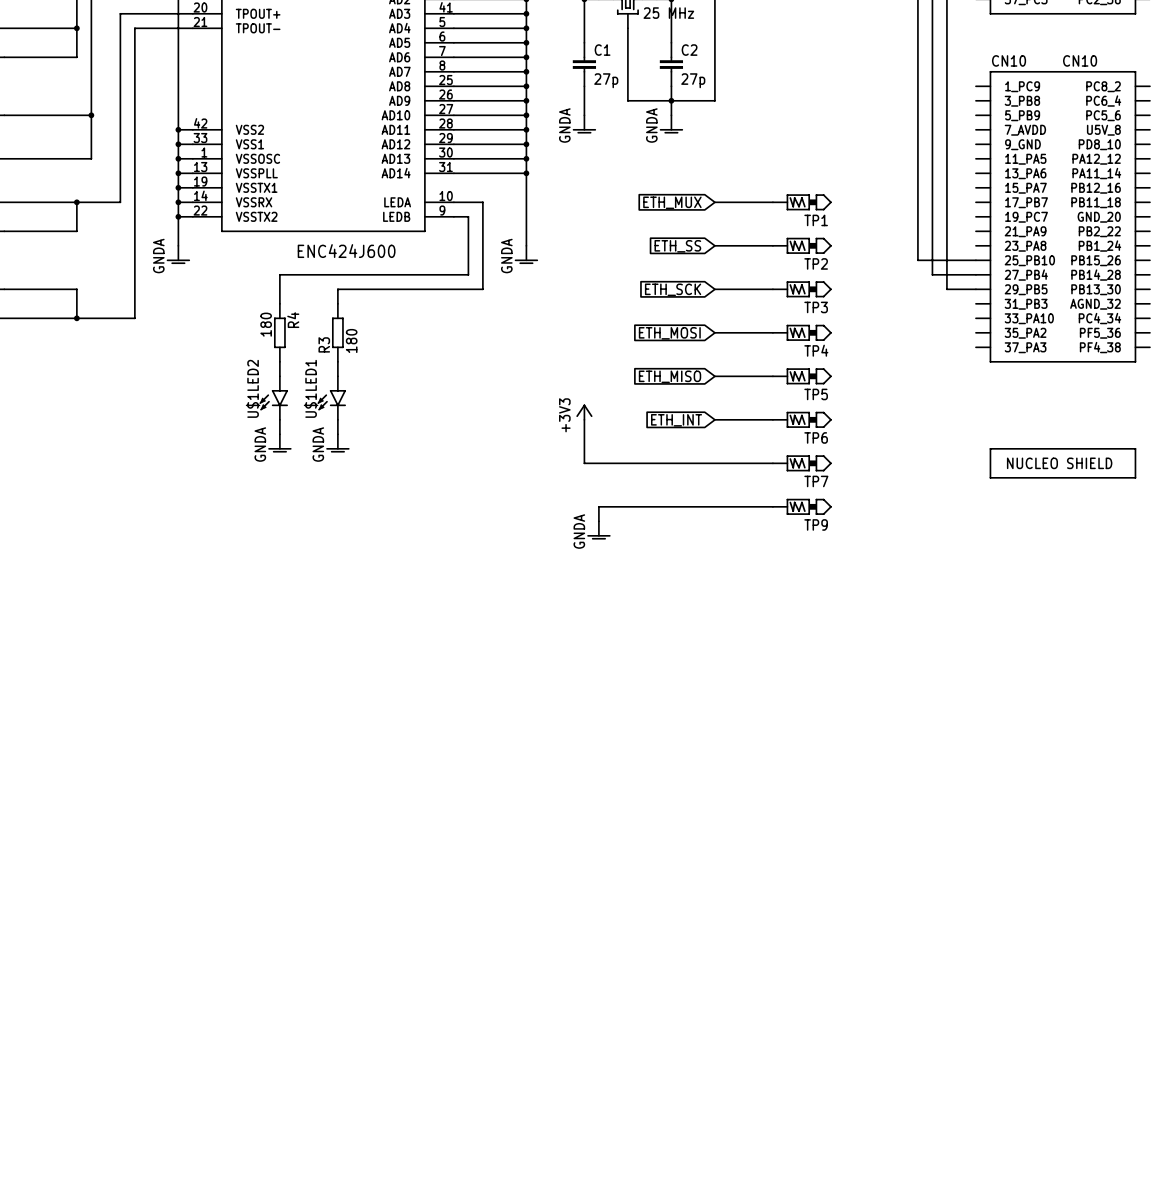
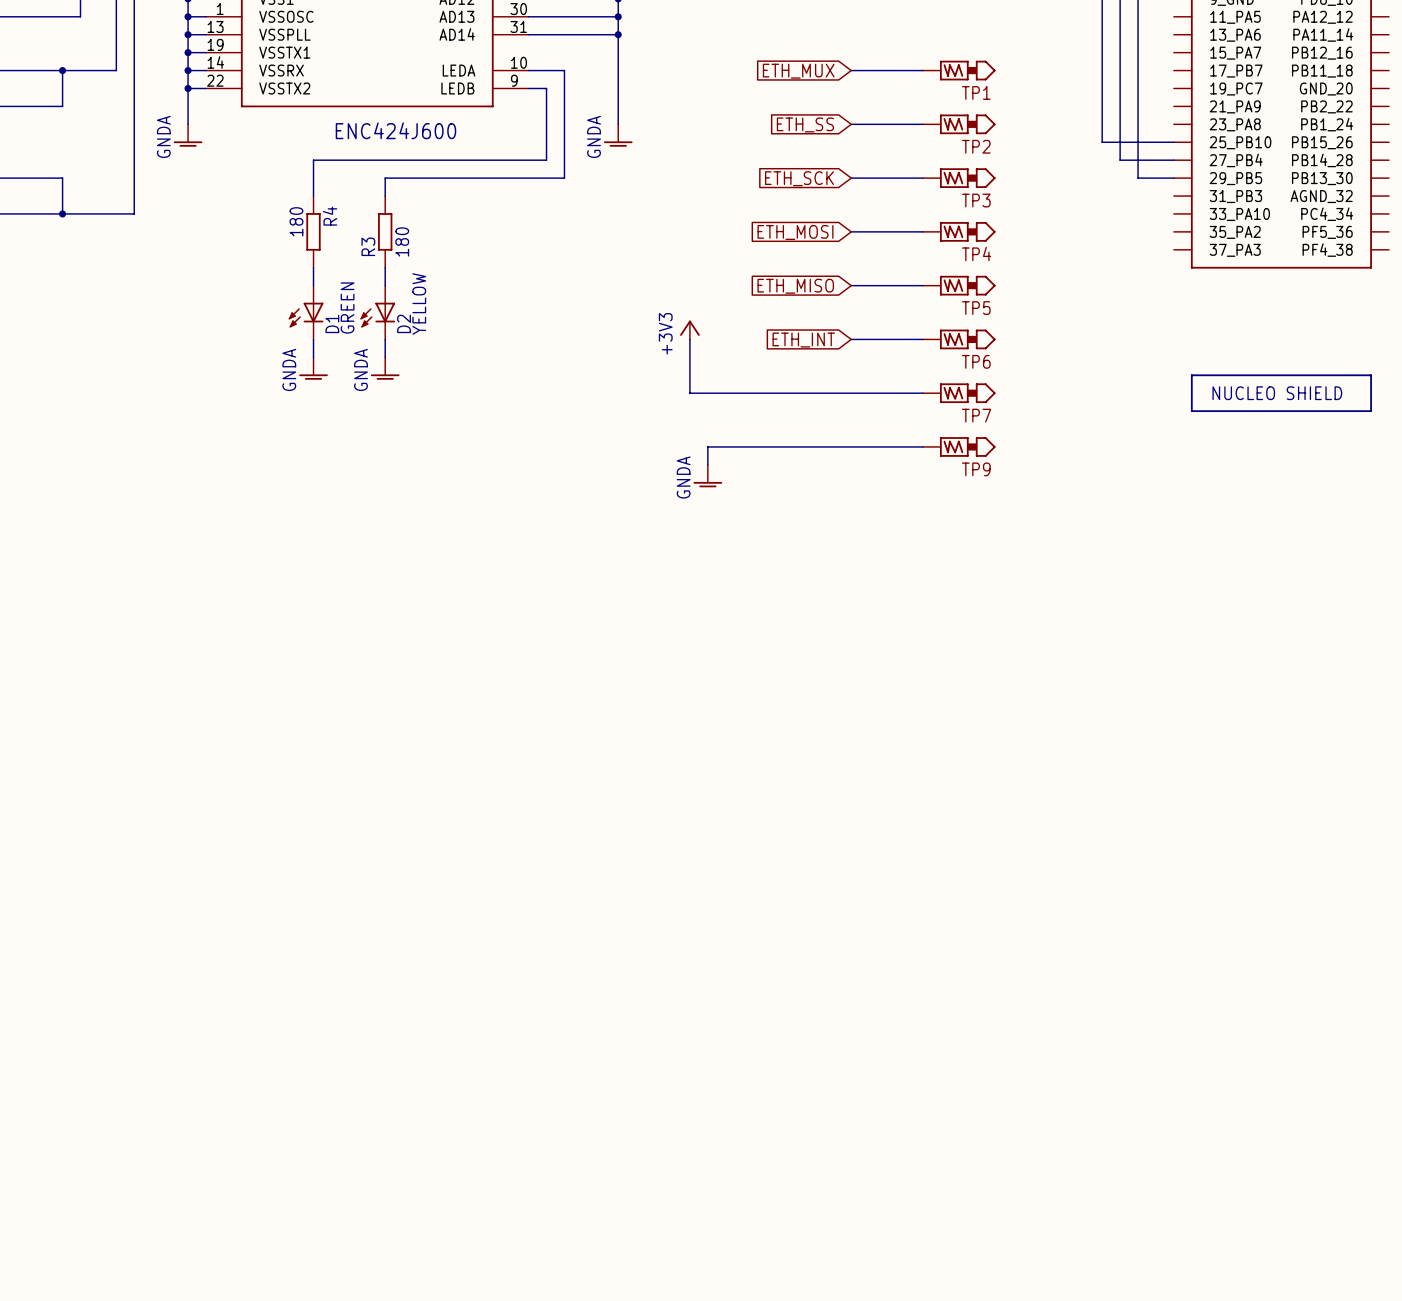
U$1LED2: (273, 398) -> none
D1: none -> GREEN (306, 312)
U$1LED1: (331, 398) -> none
D2: none -> YELLOW (377, 312)

